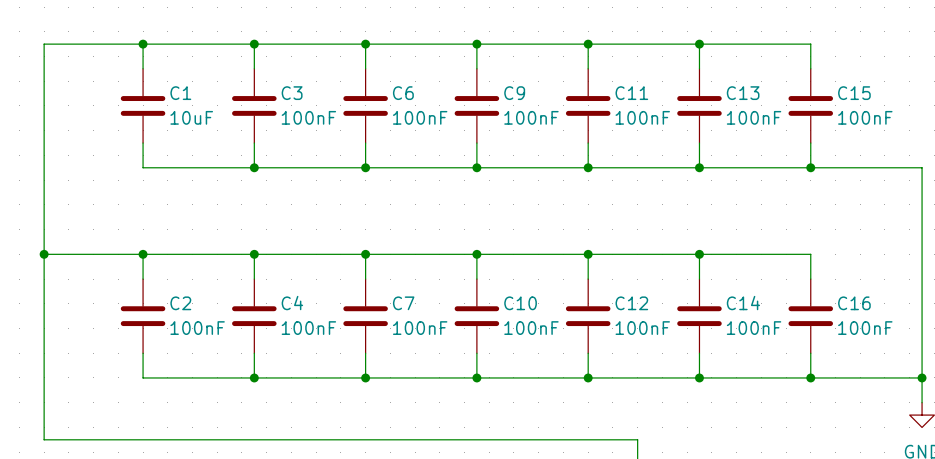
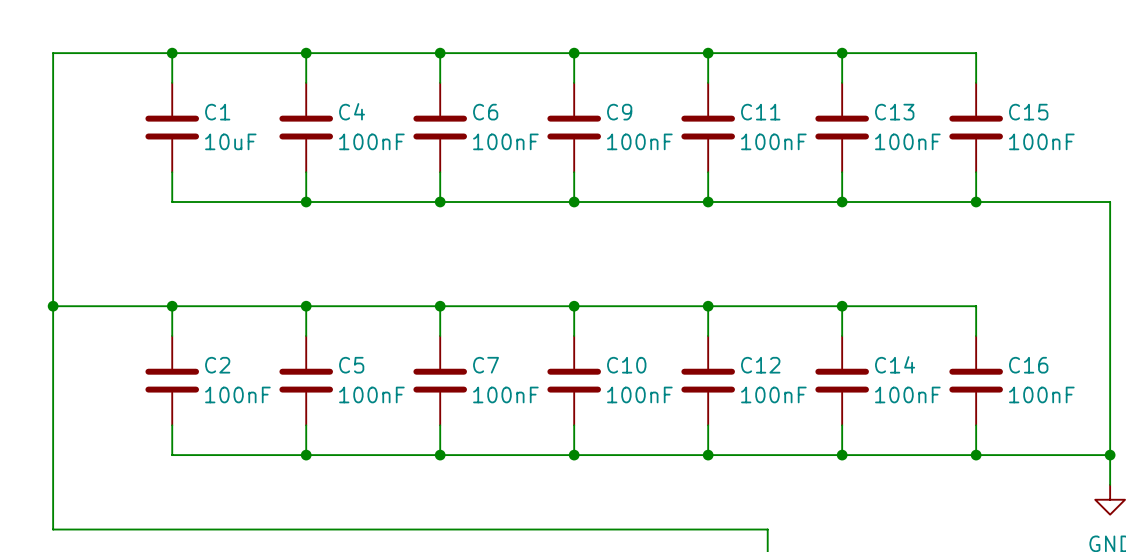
C3 name: C3 (292, 93) -> C4 (352, 111)
C4 name: C4 (292, 303) -> C5 (351, 365)

